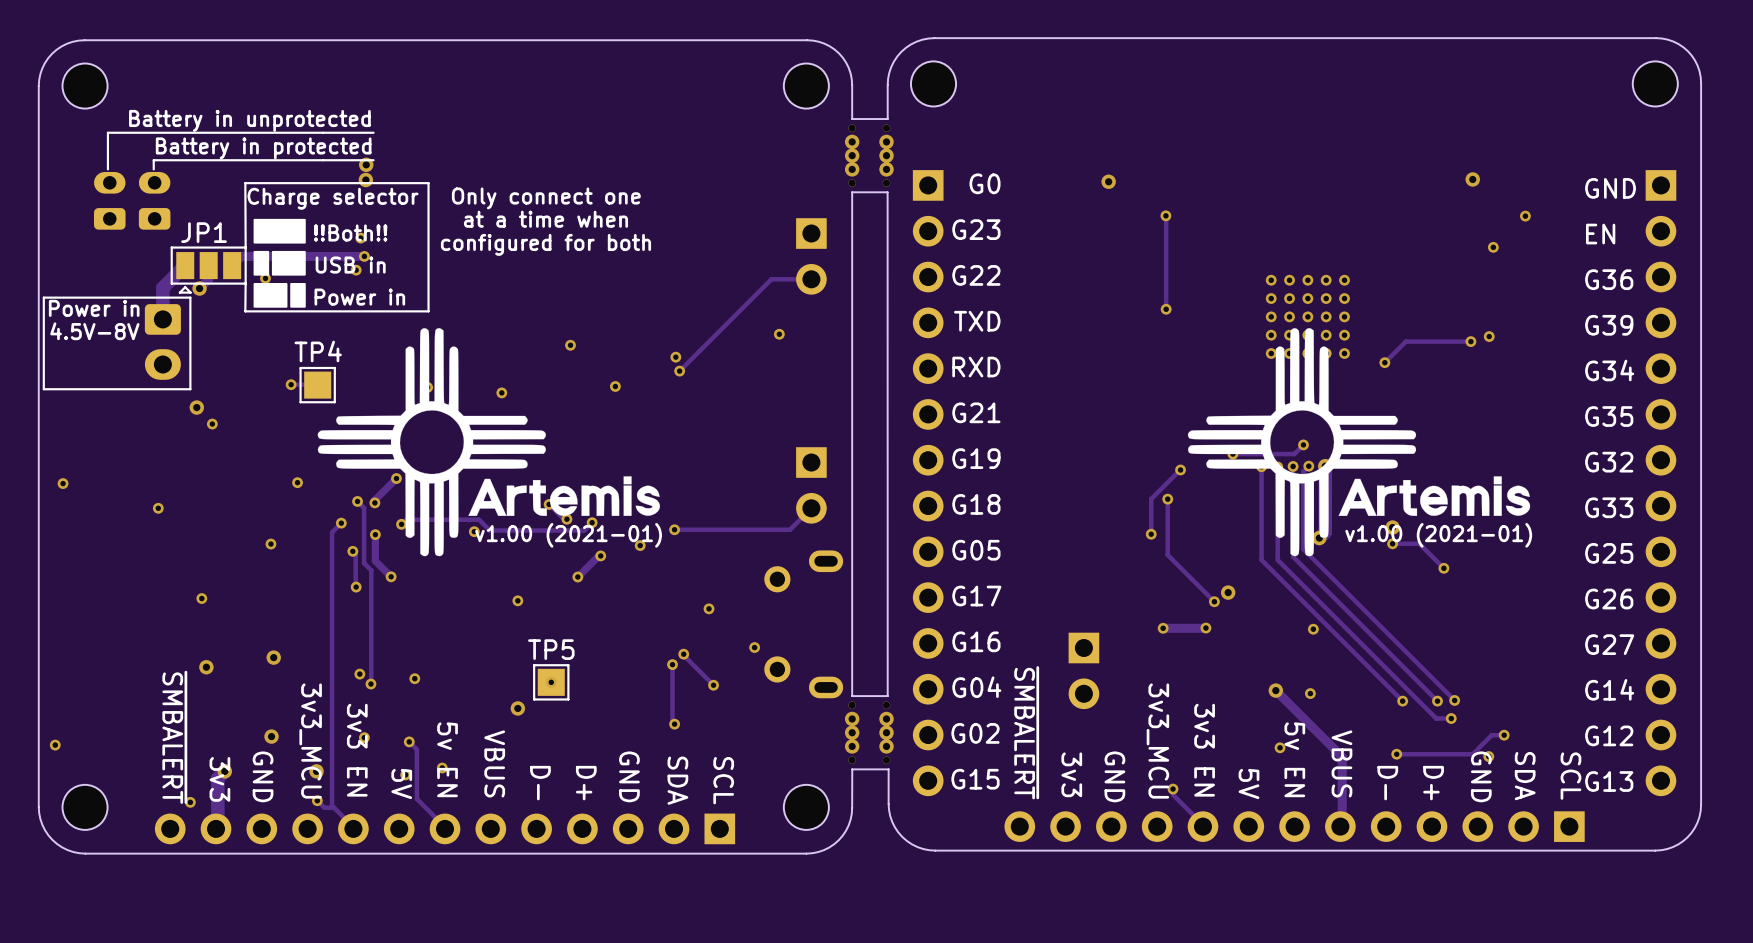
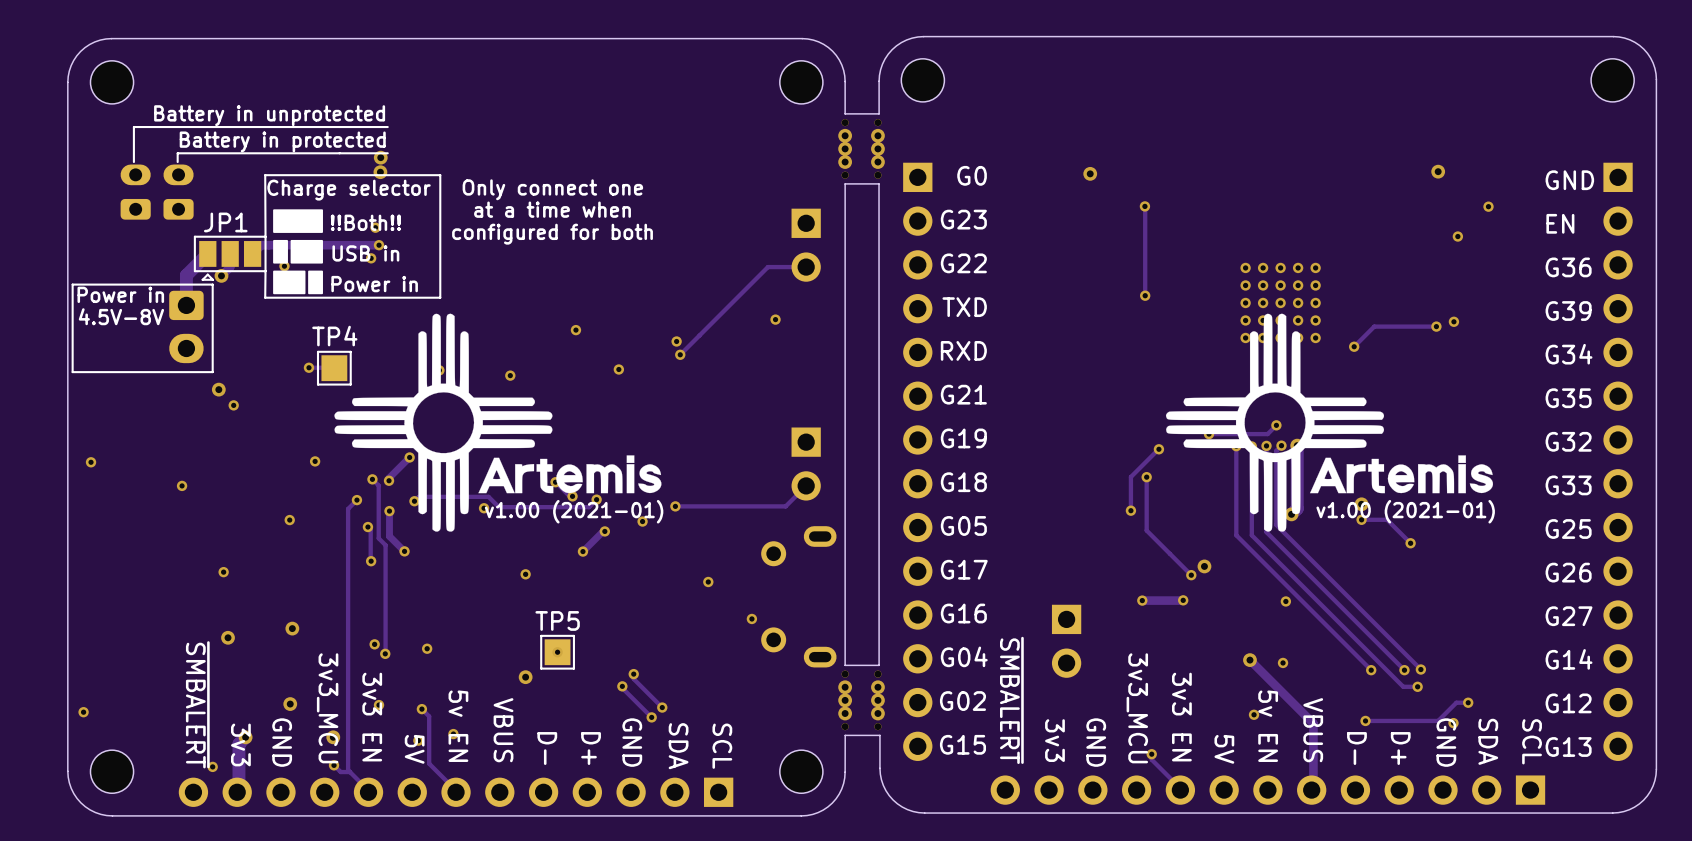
track: (683, 654) (713, 685) -> none
via: (683, 654) -> none
track: (672, 664) (672, 722) (674, 724) -> none
via: (672, 664) -> none
via: (713, 685) -> none
via: none -> (633, 674)
track: none -> (634, 674) (633, 679) (662, 707)
track: none -> (622, 686) (651, 717)
via: none -> (622, 686)
via: (674, 724) -> none
via: none -> (662, 707)
via: none -> (651, 717)

